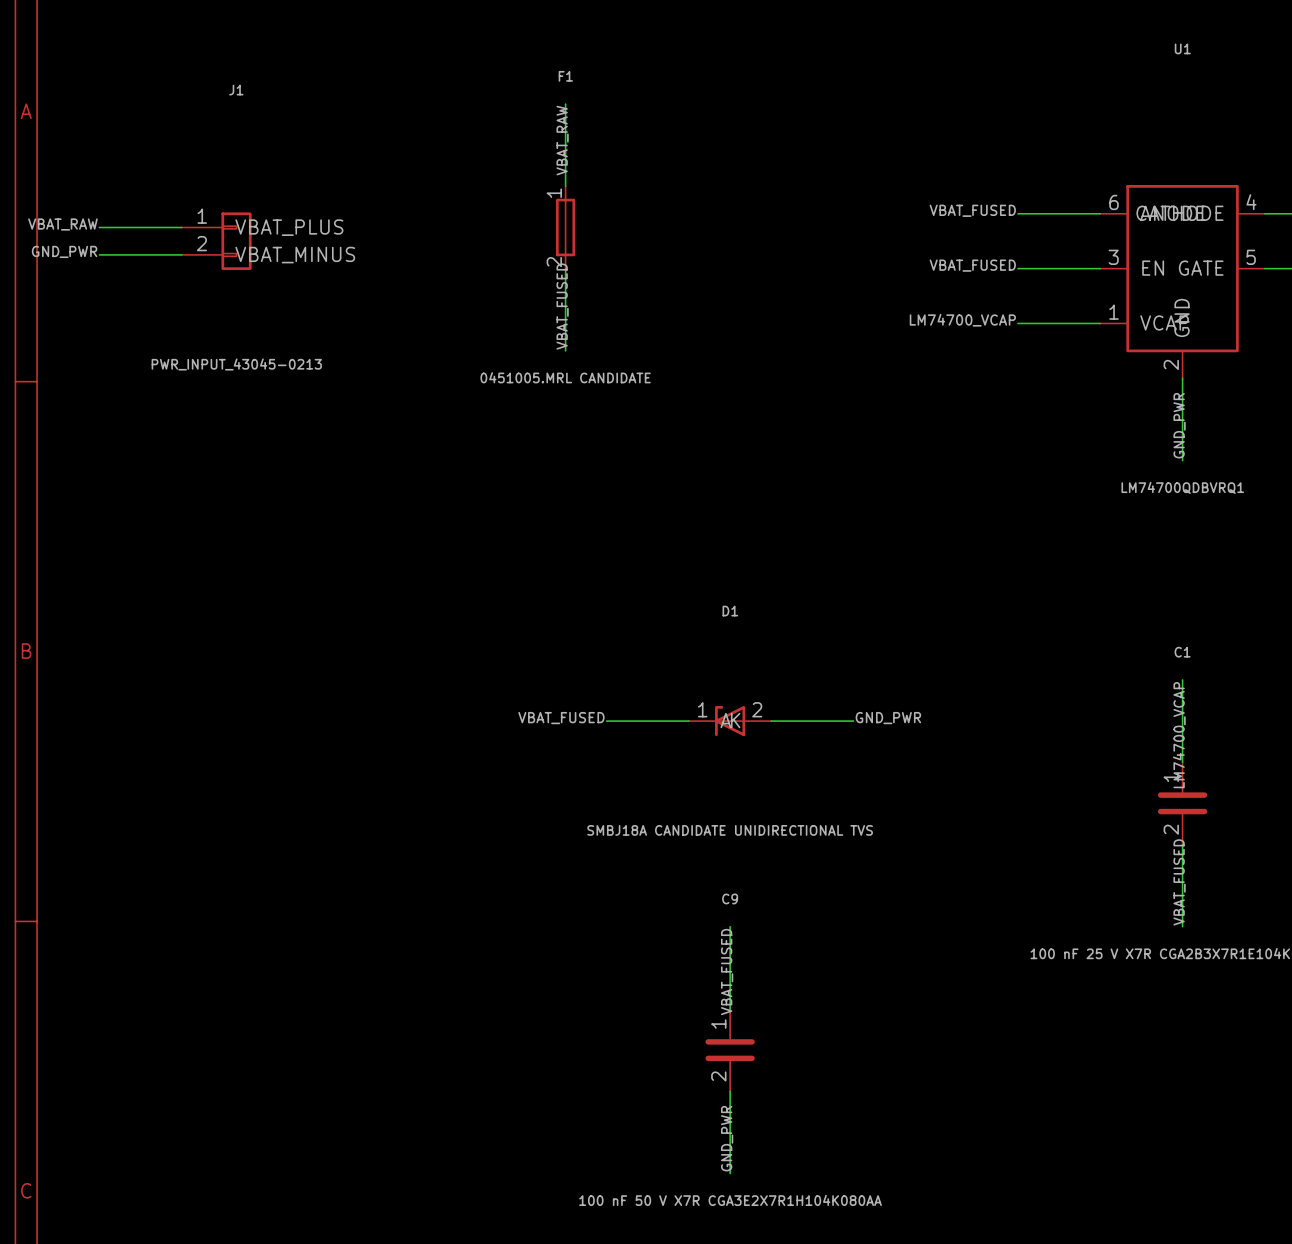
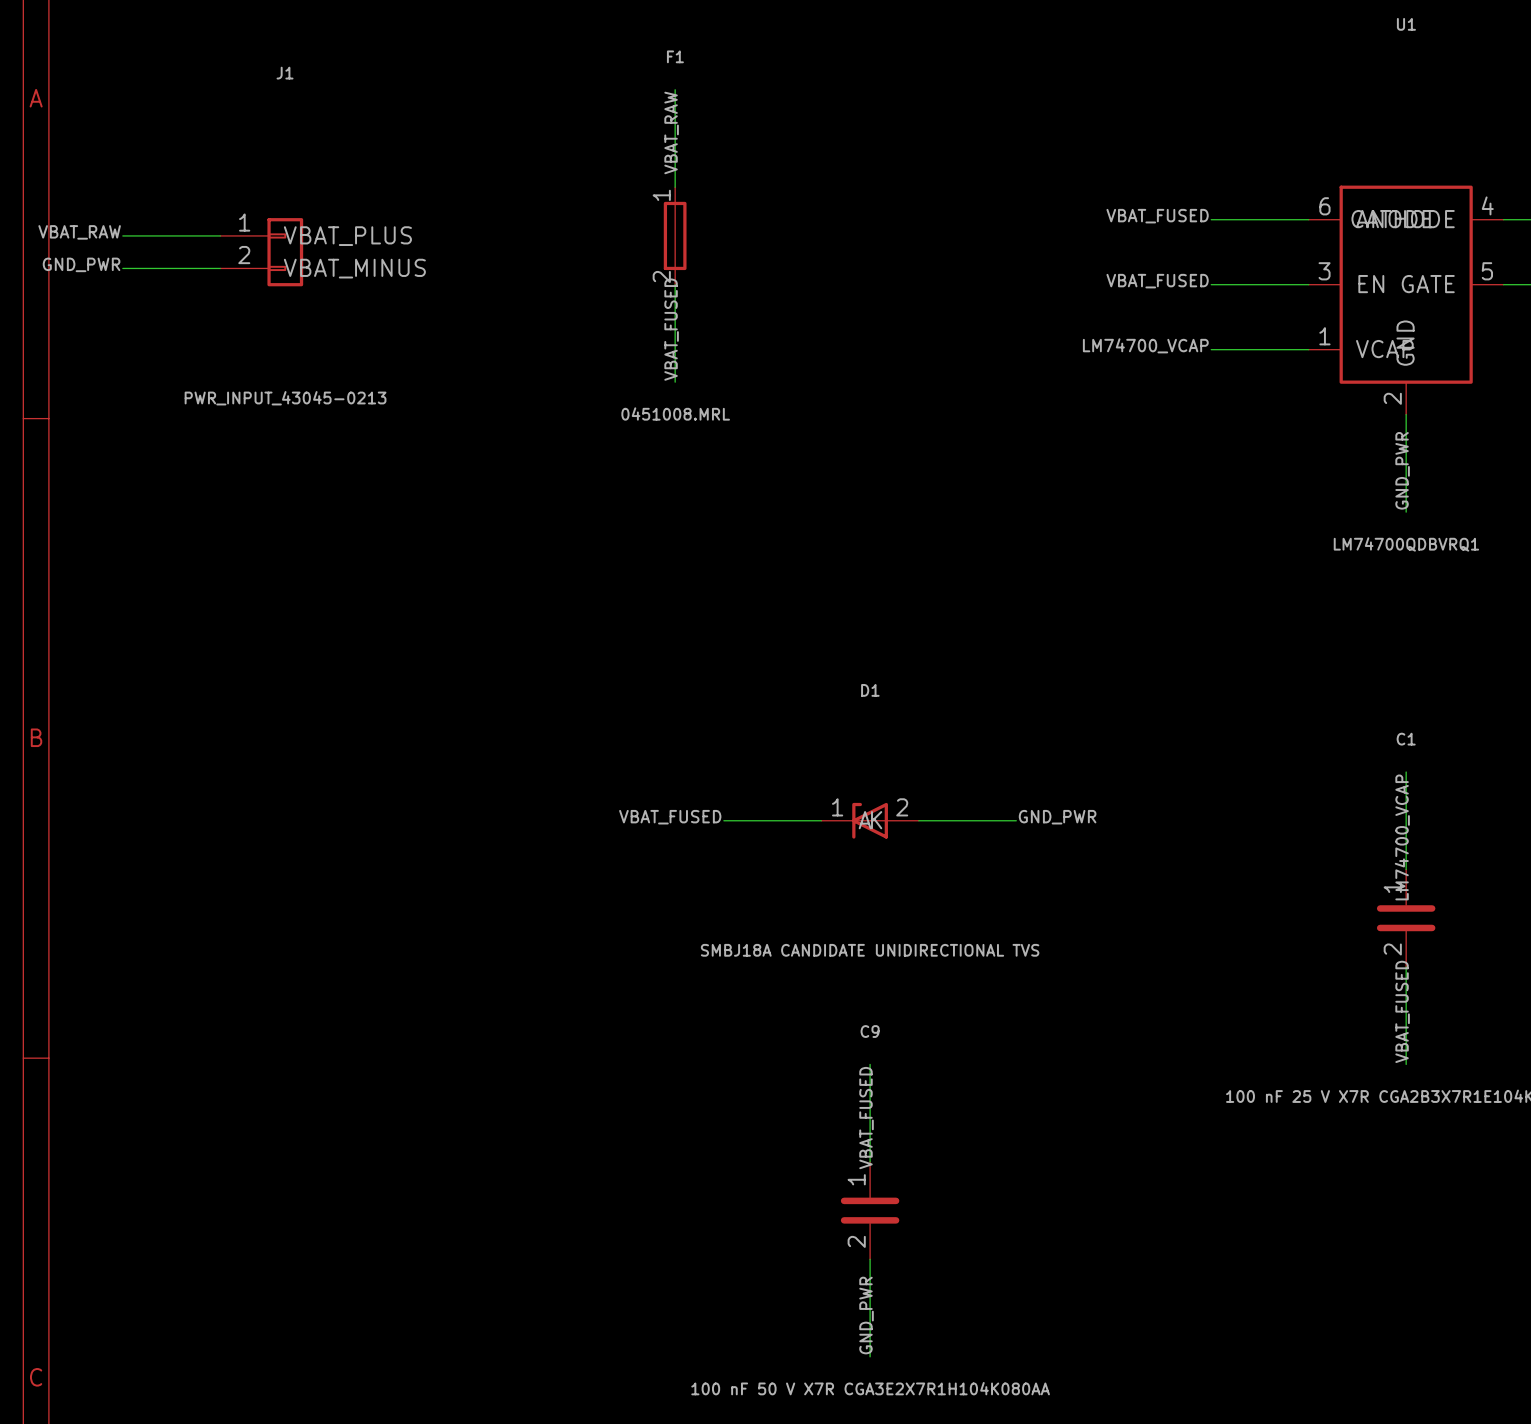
F1 value: 0451005.MRL CANDIDATE (565, 377) -> 0451008.MRL (675, 413)

